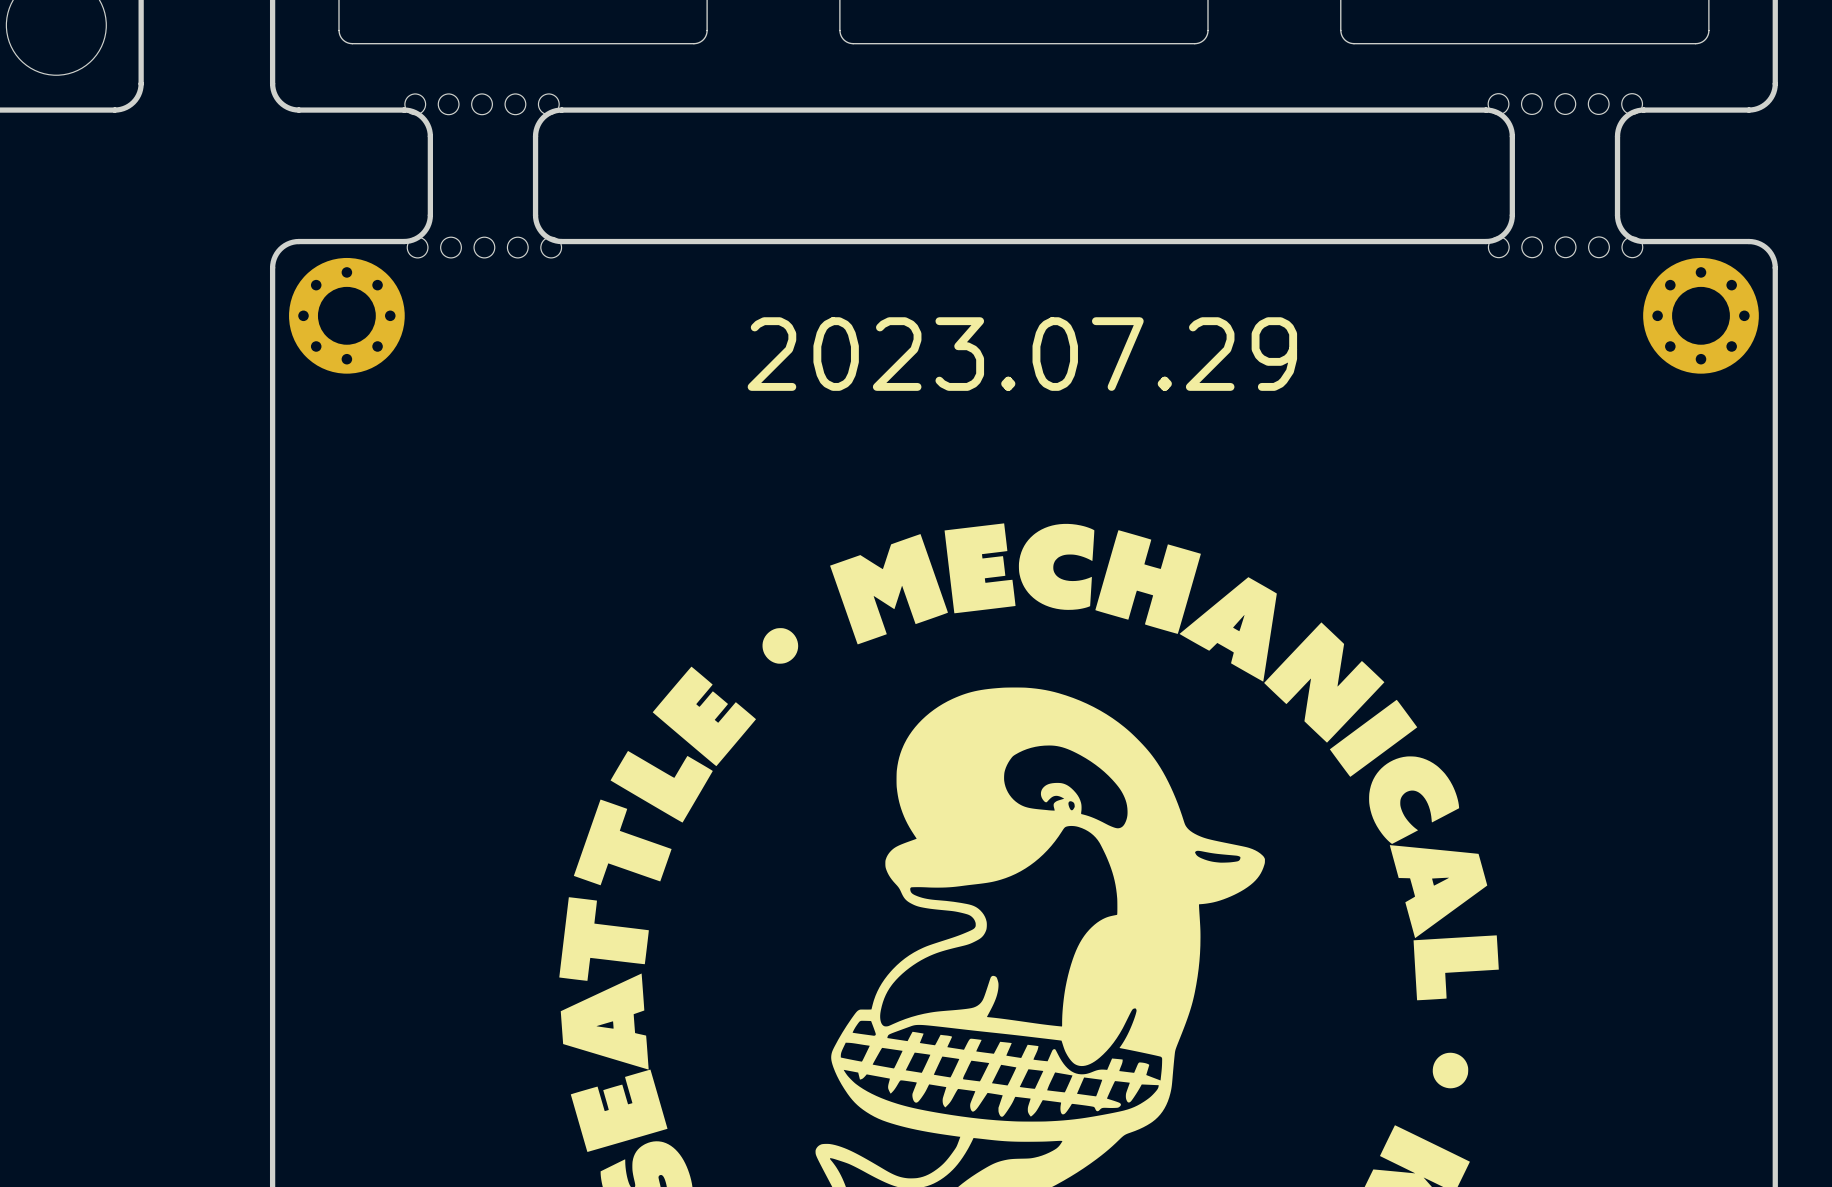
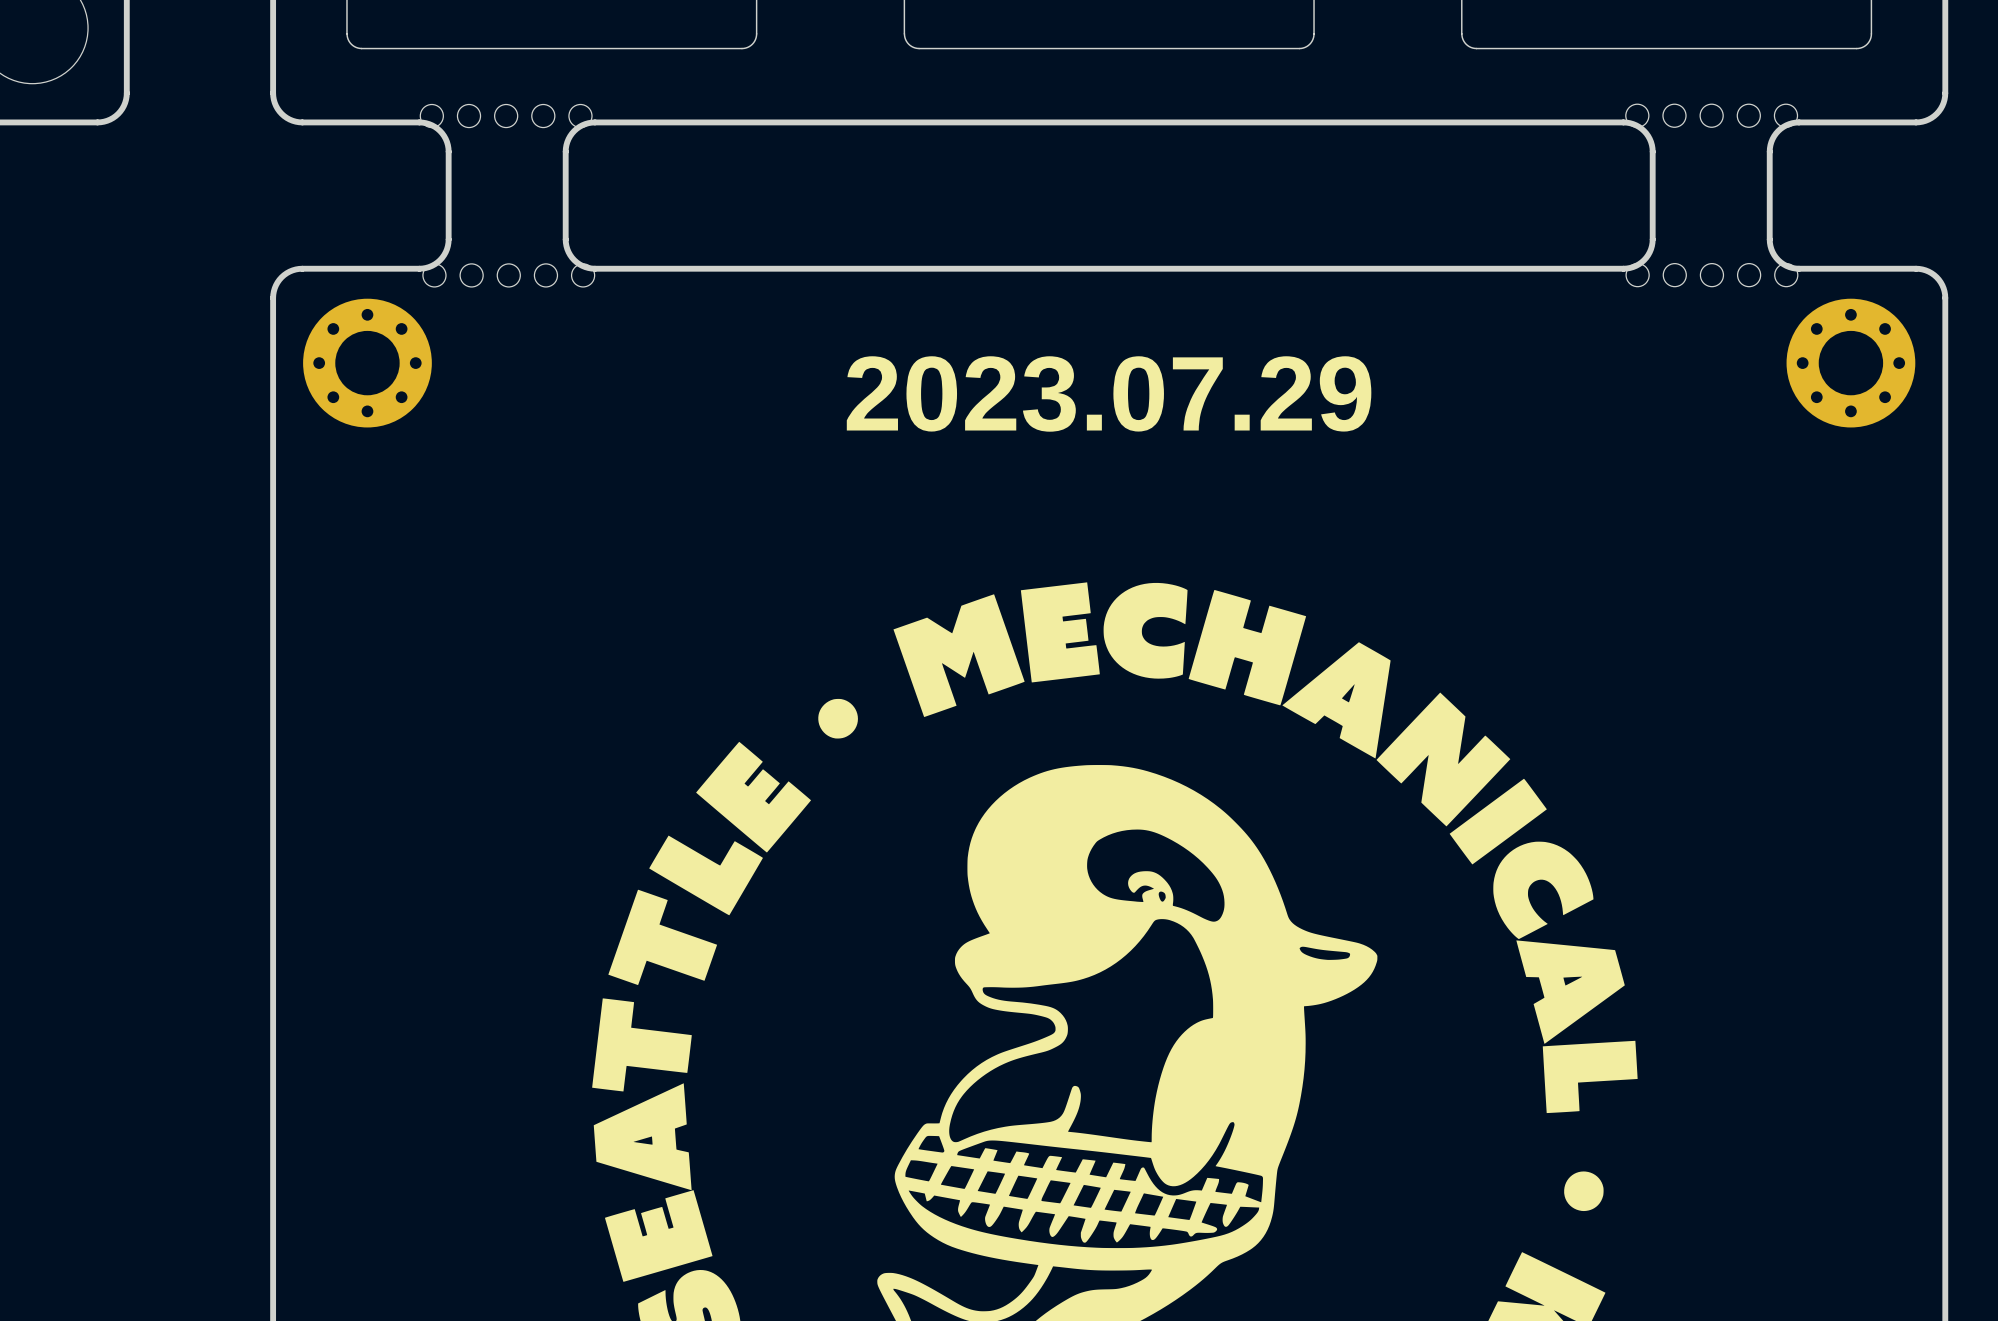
part position: (346, 315) -> (367, 363)
part position: (1700, 315) -> (1850, 363)

